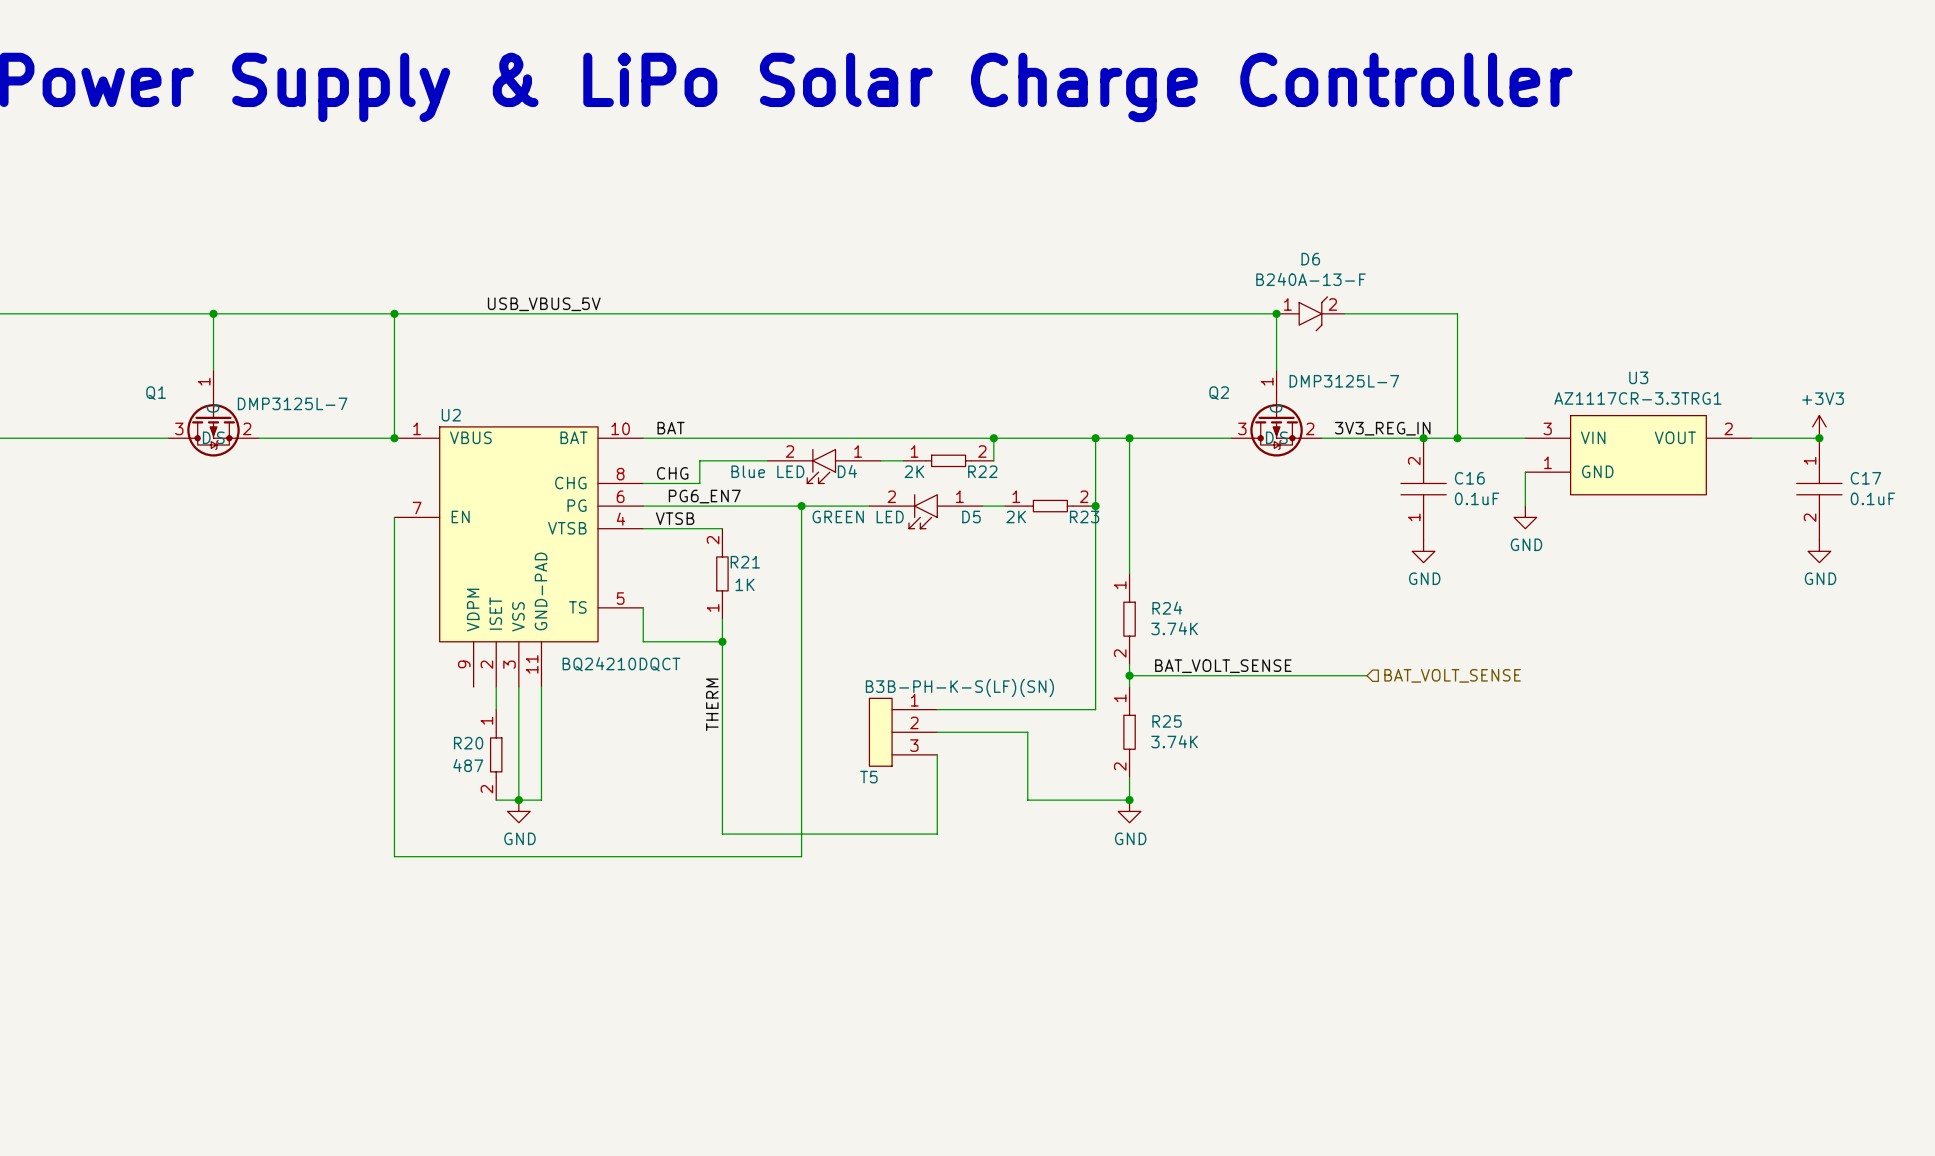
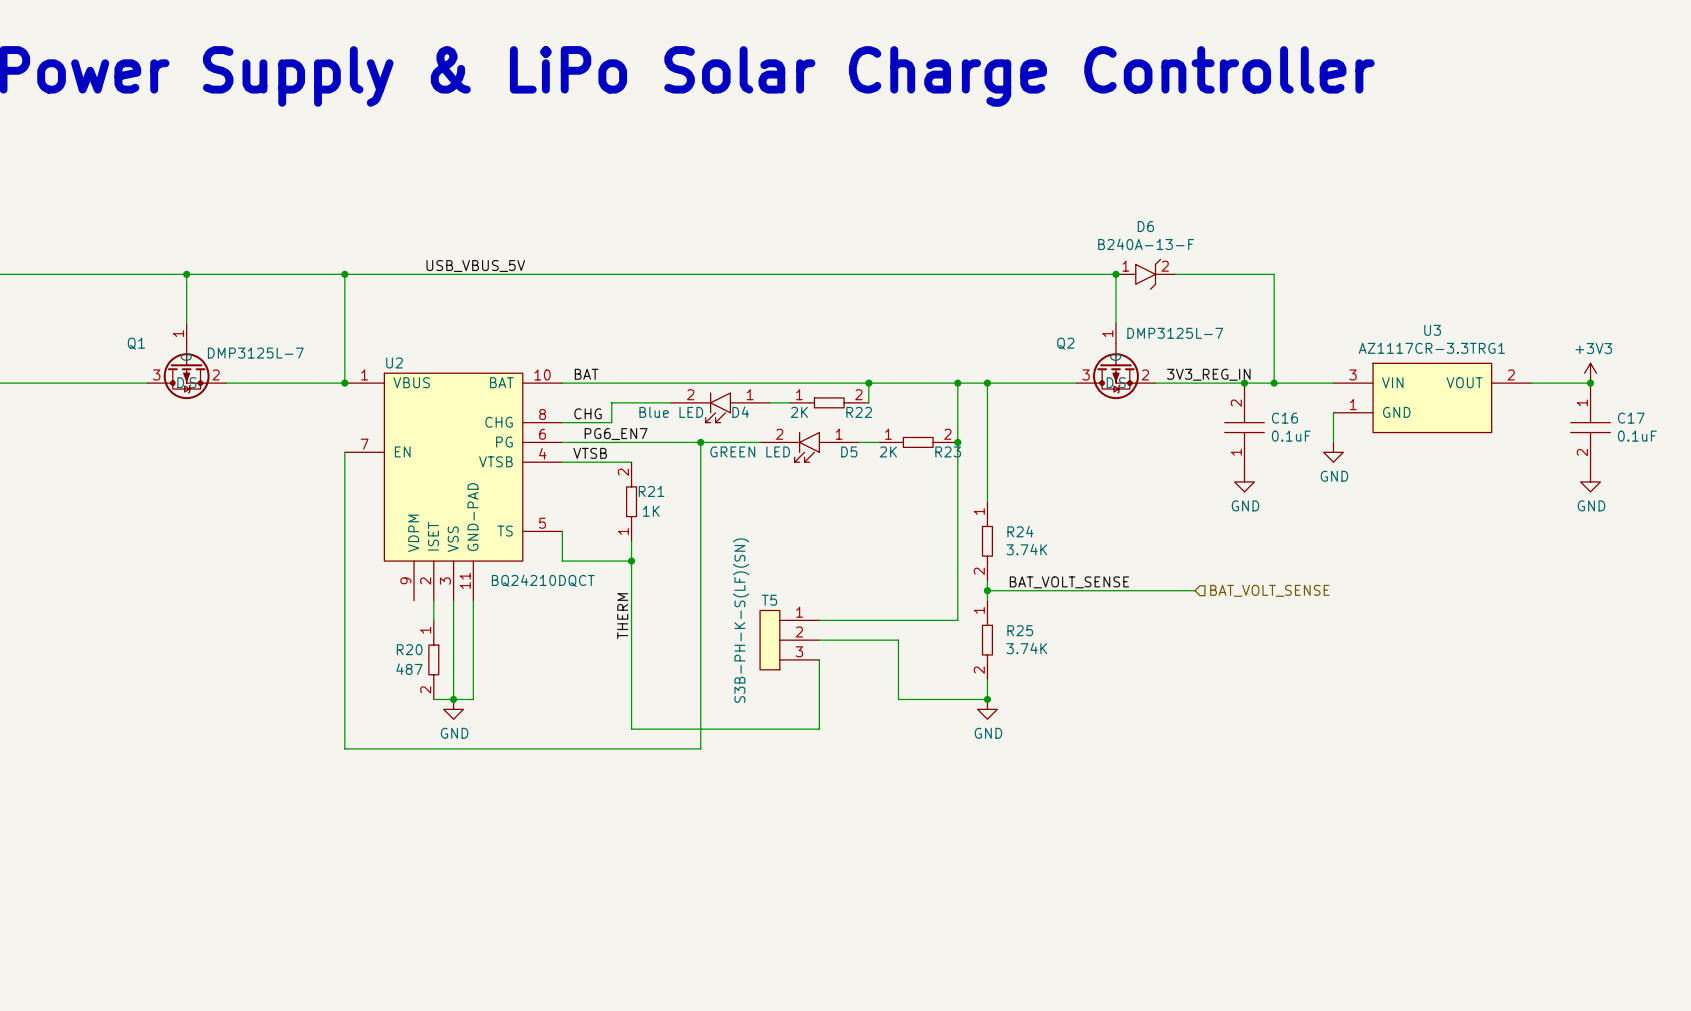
T5 value: B3B-PH-K-S(LF)(SN) (959, 687) -> S3B-PH-K-S(LF)(SN) (741, 620)
T5 name position: T5 (868, 777) -> T5 (769, 600)

